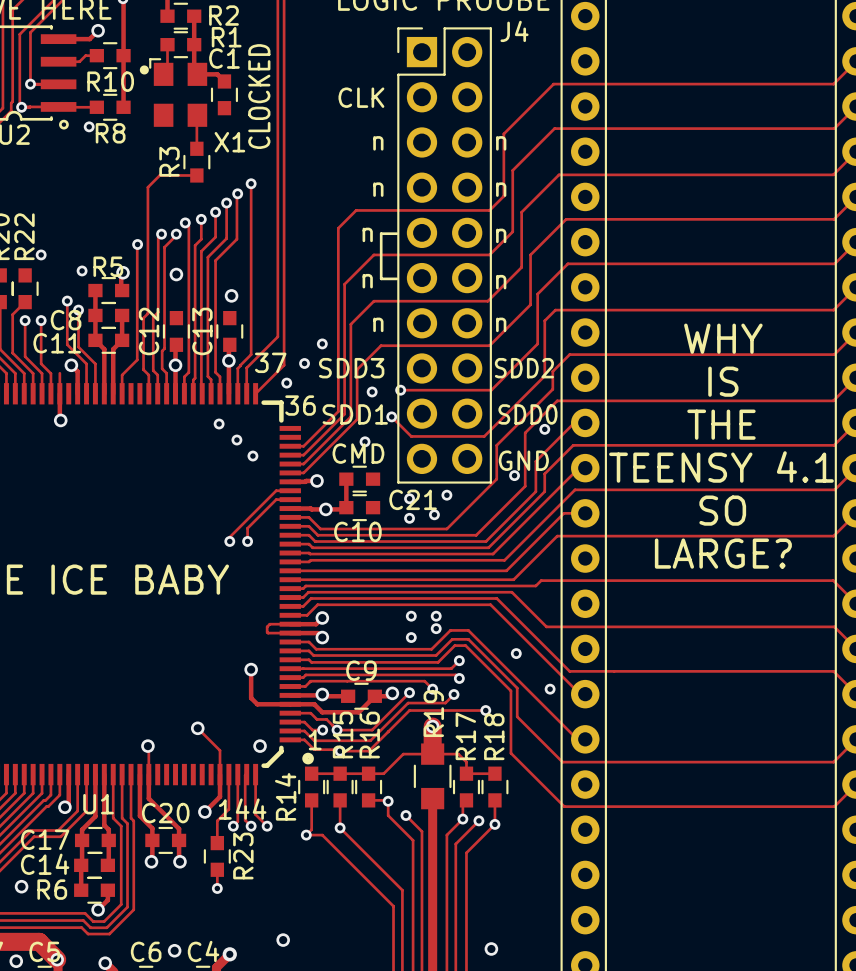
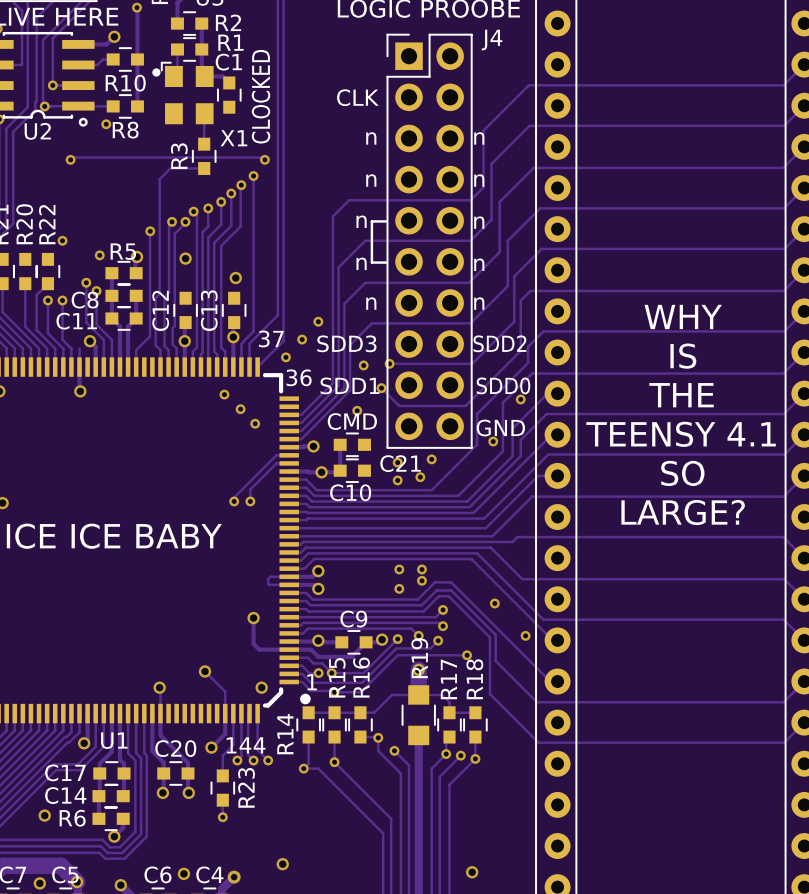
track: none -> (70, 159) (72, 157) (262, 157) (264, 159)
via: none -> (70, 159)
via: none -> (264, 159)

